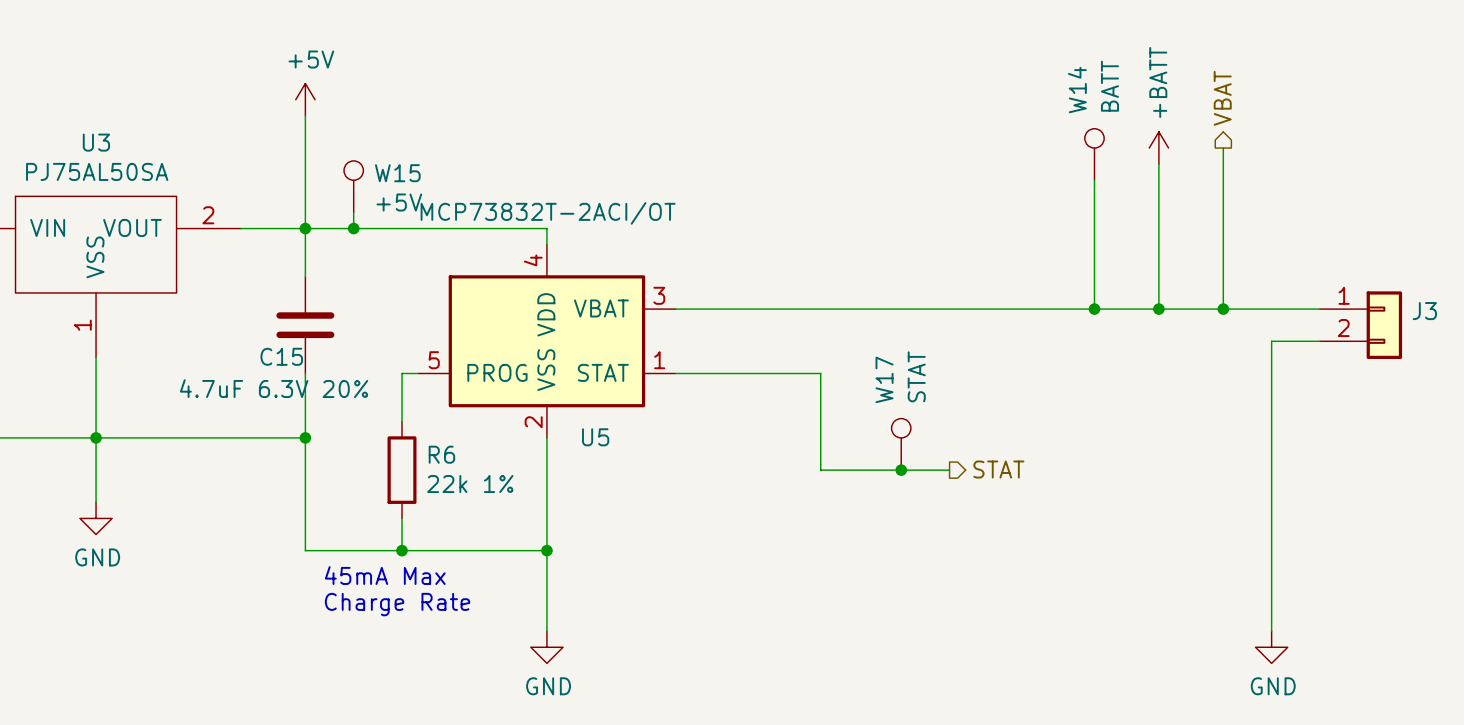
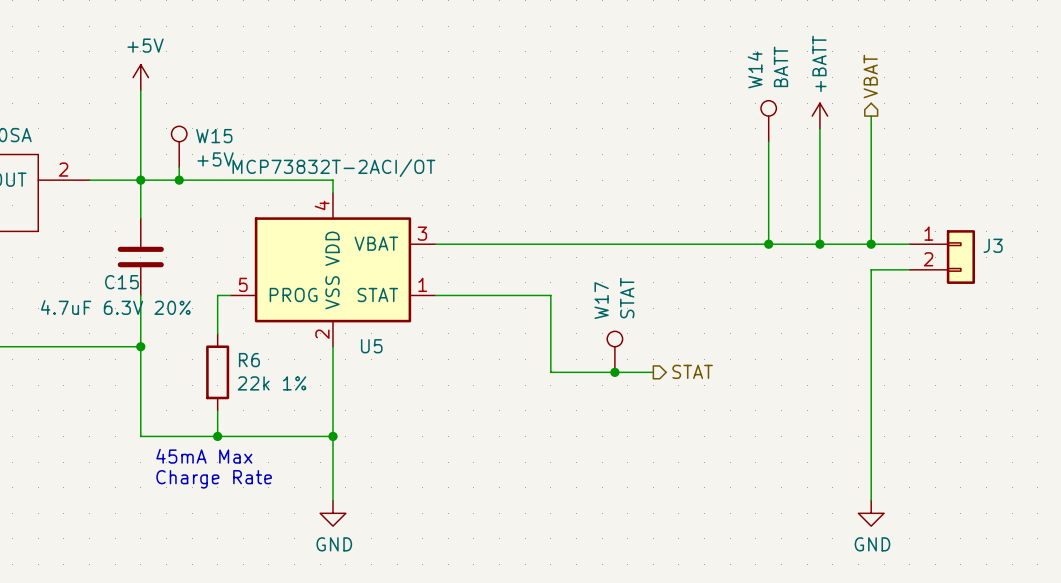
J3 position: (1361, 325) -> (942, 257)
wire: (1319, 341) (1271, 341) (1271, 631) -> (909, 269) (871, 269) (871, 500)
power symbol position: GND (1271, 647) -> GND (871, 513)

